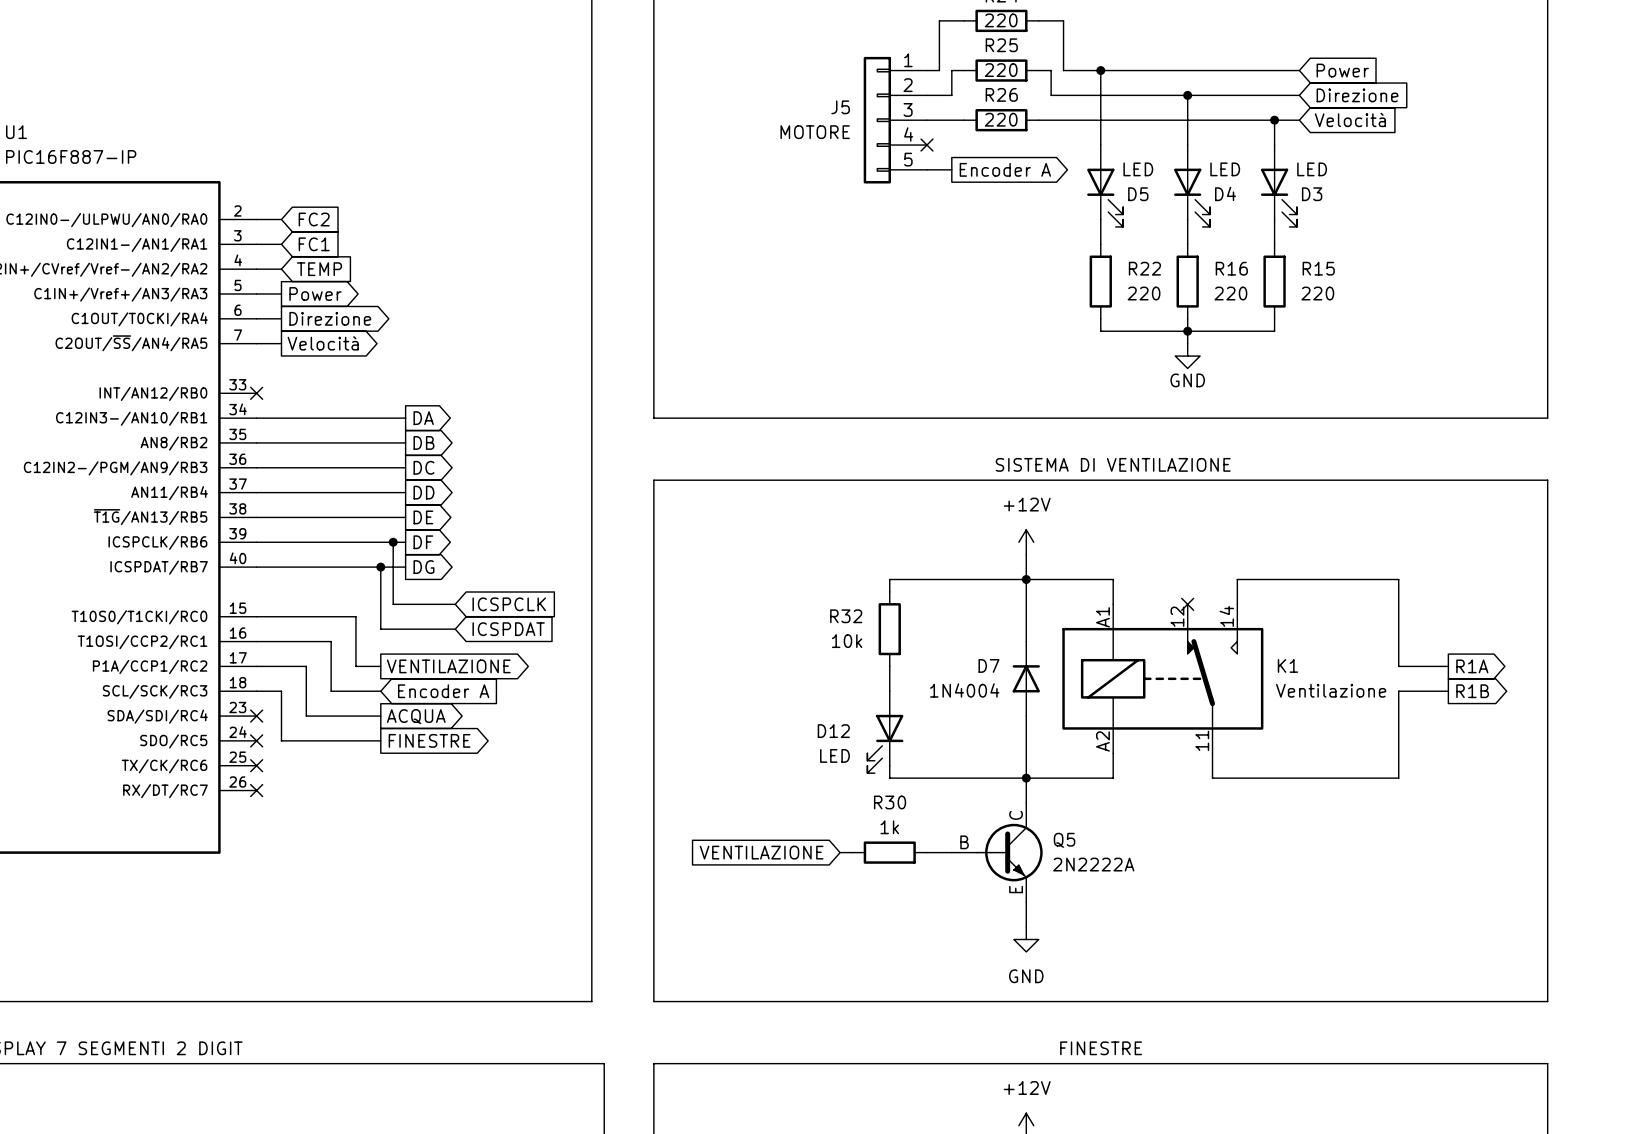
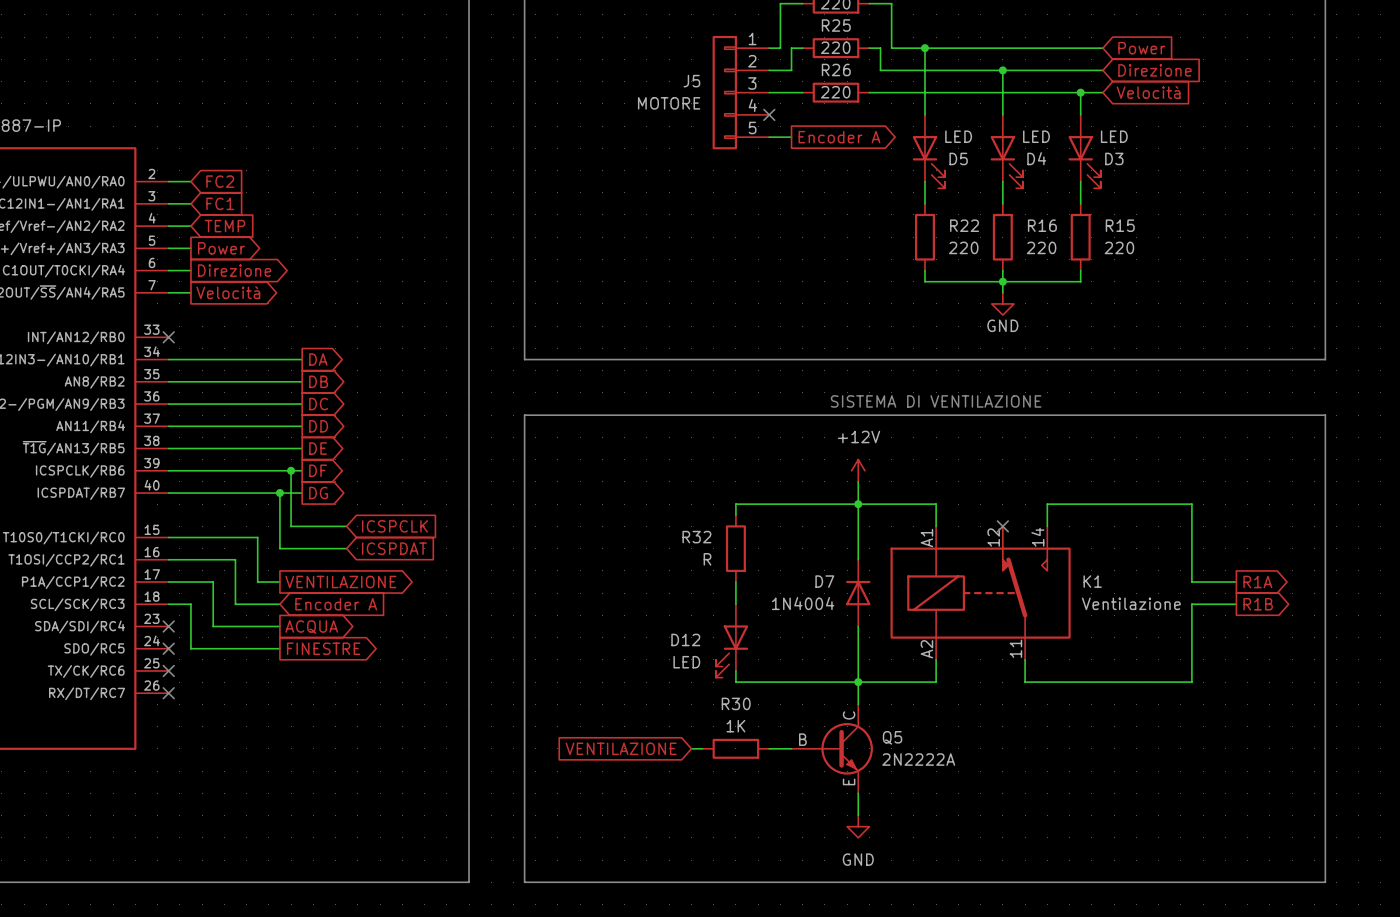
R32 value: 10k (847, 641) -> R (707, 559)
R30 value: 1k (889, 827) -> 1K (735, 726)

